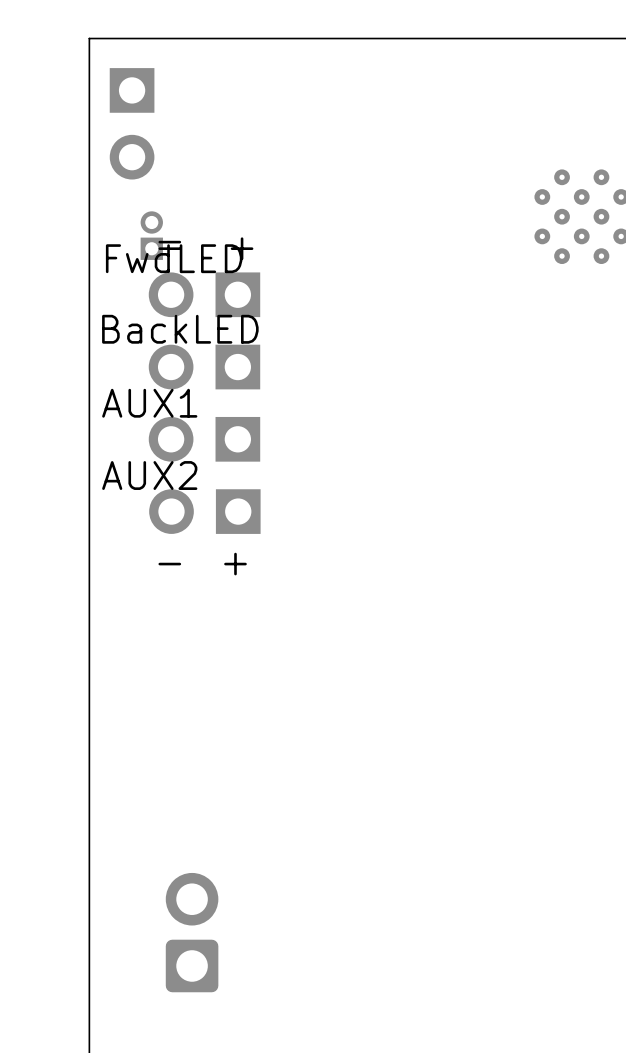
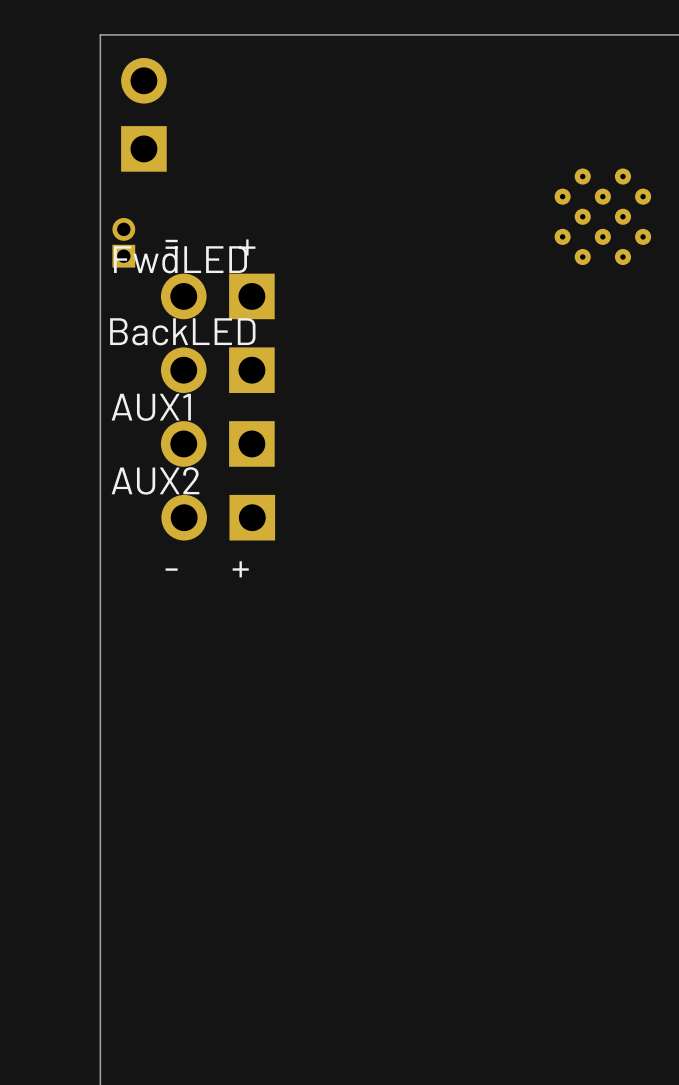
part rotation: 0° (132, 123) -> 180° (143, 114)
part position: (151, 235) -> (123, 242)
part: (192, 932) -> none

